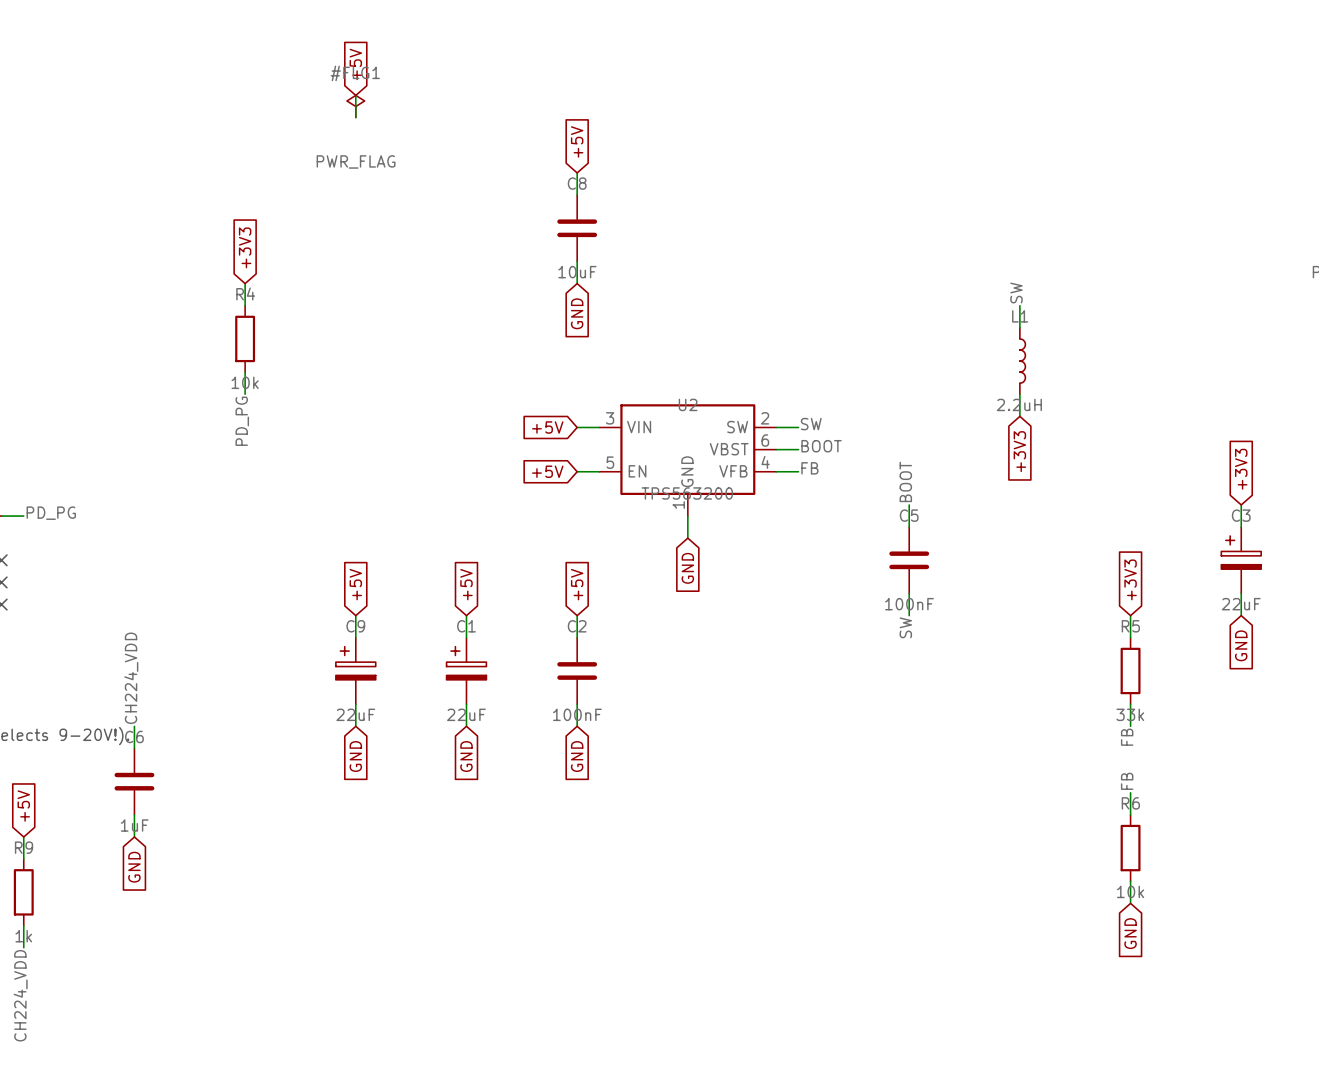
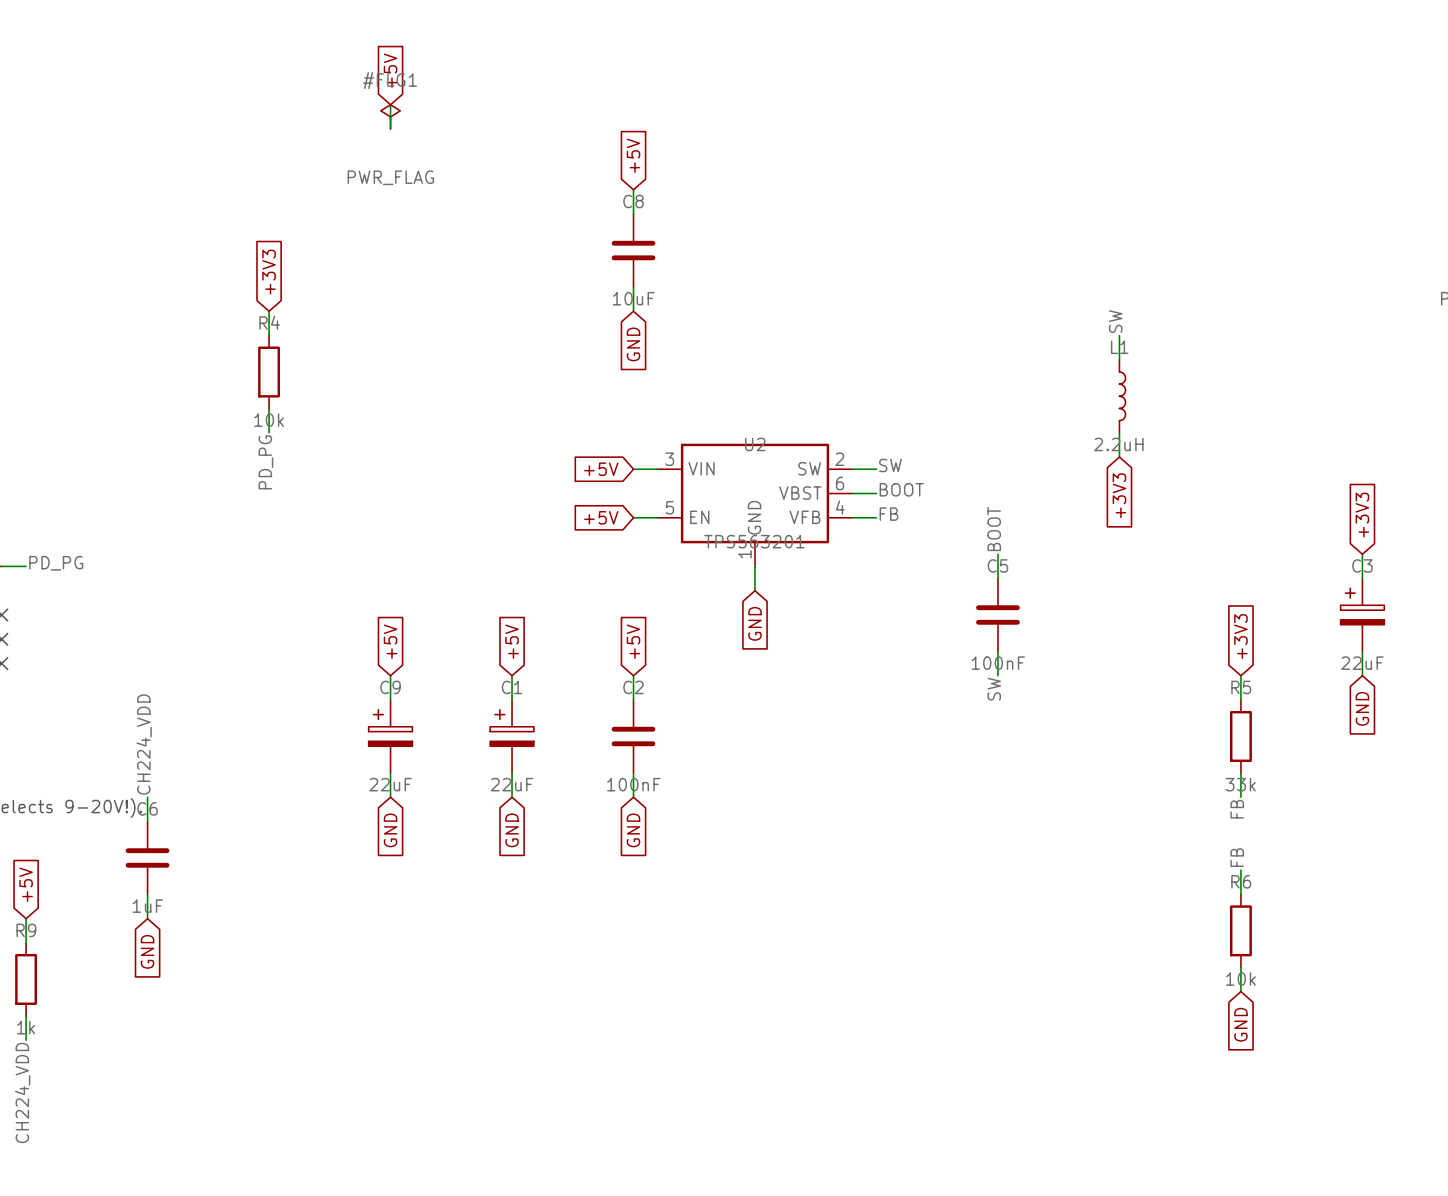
U2 value: TPS563200 (687, 493) -> TPS563201 (754, 541)

